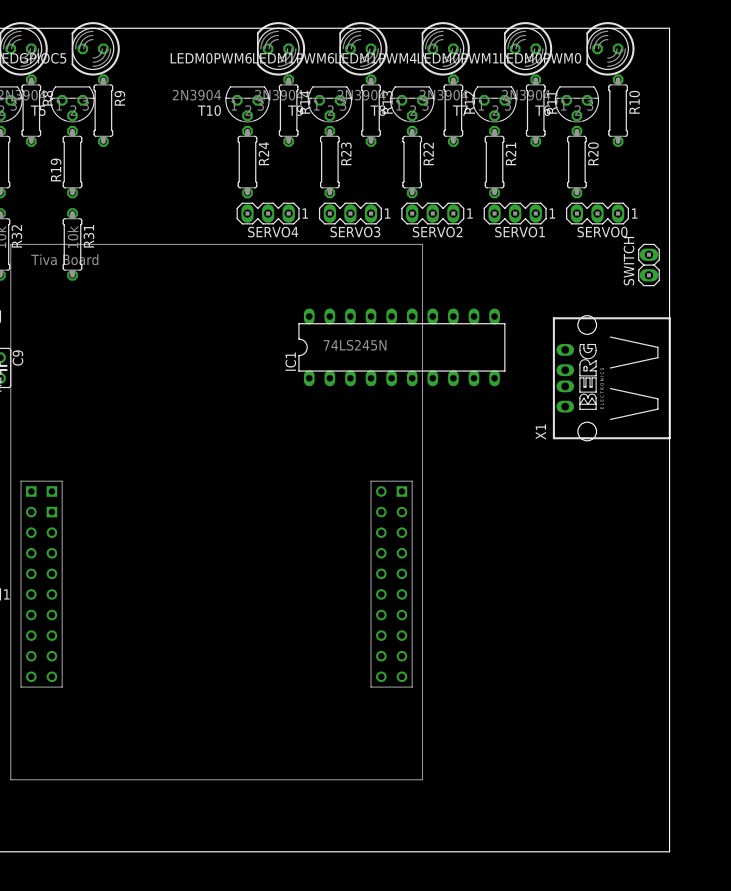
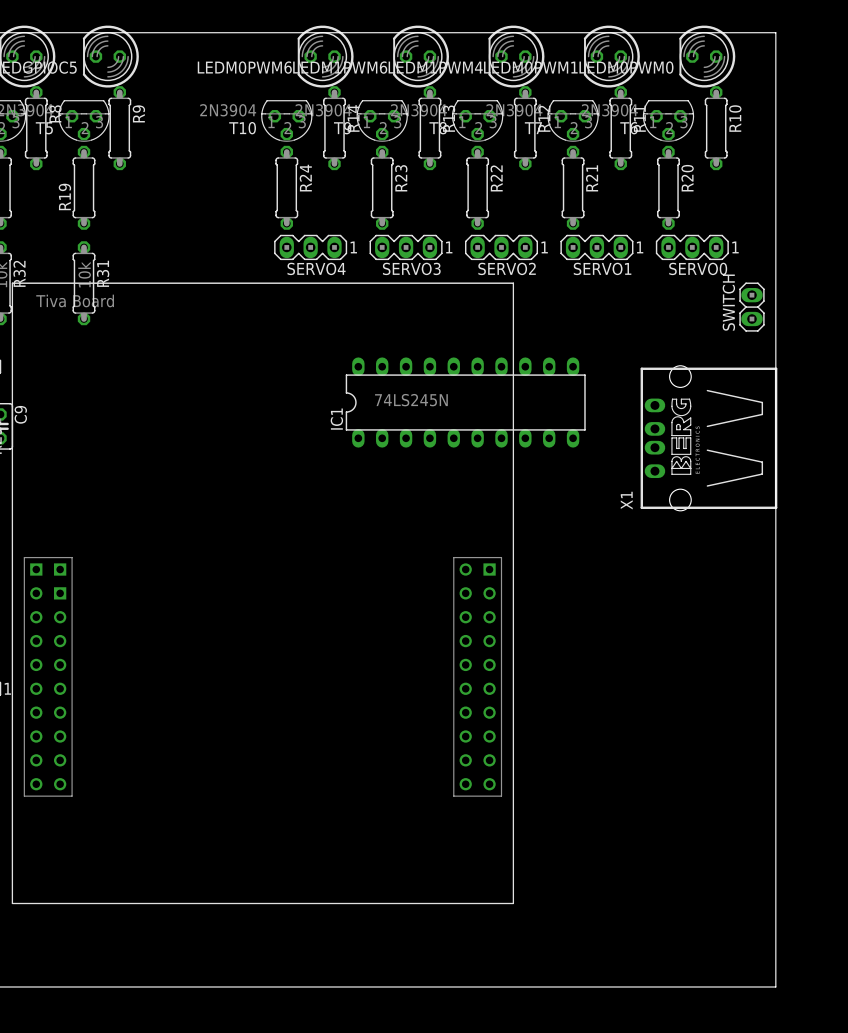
part: (216, 512) -> none
part: none -> (262, 593)

